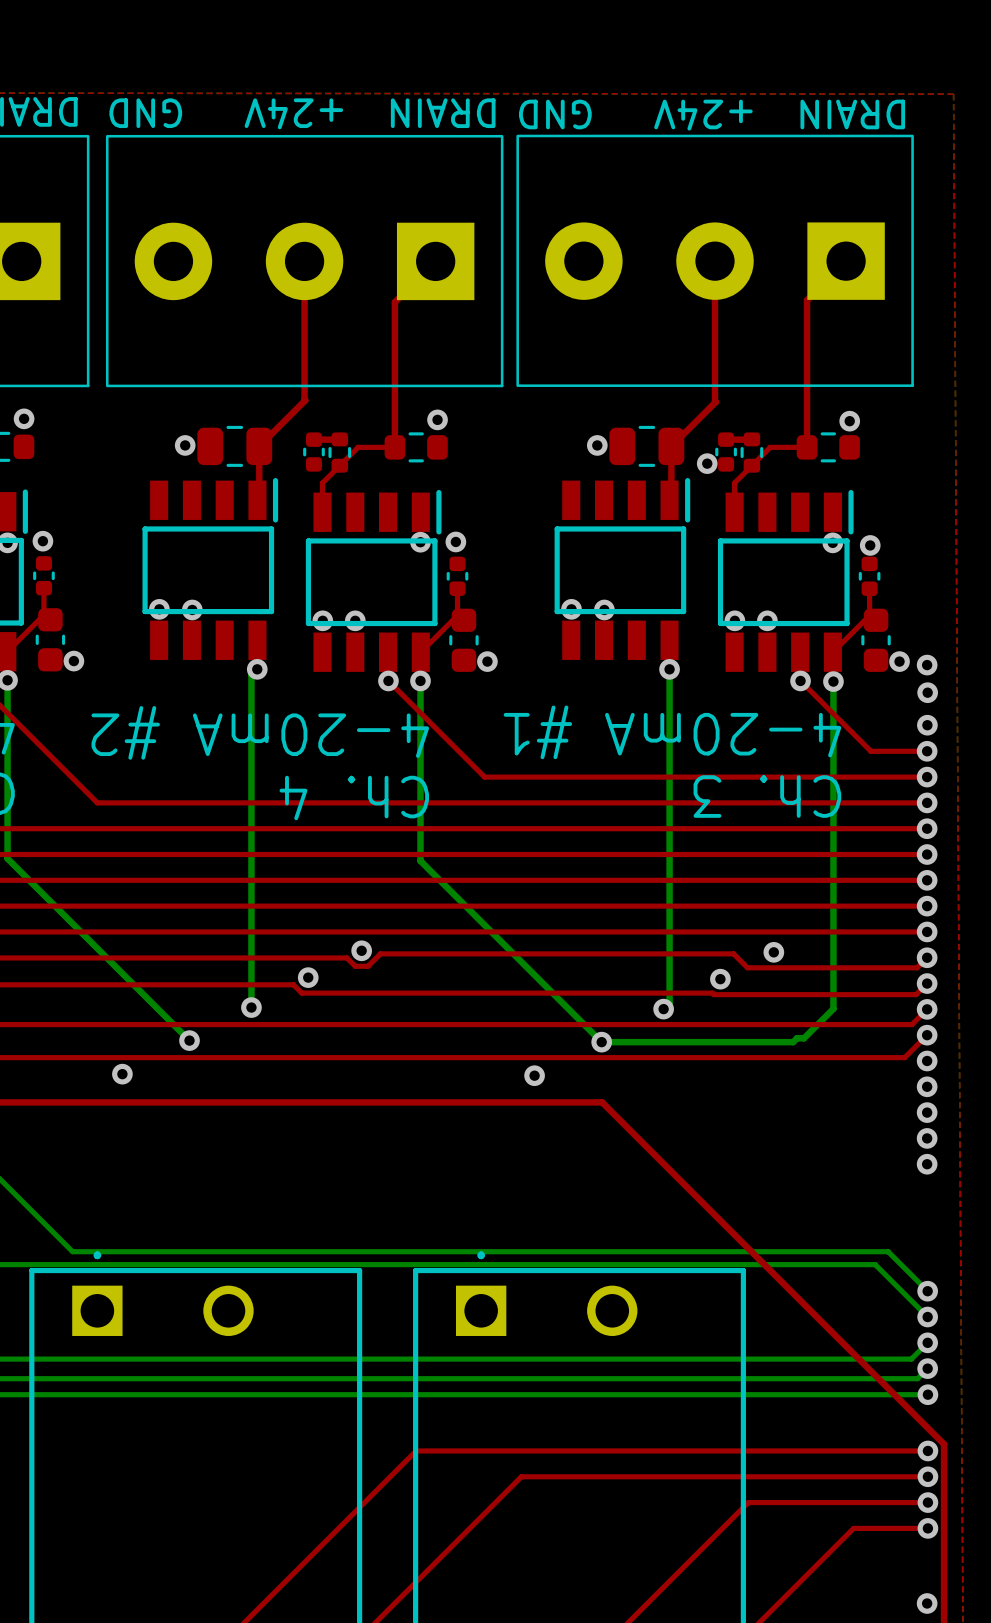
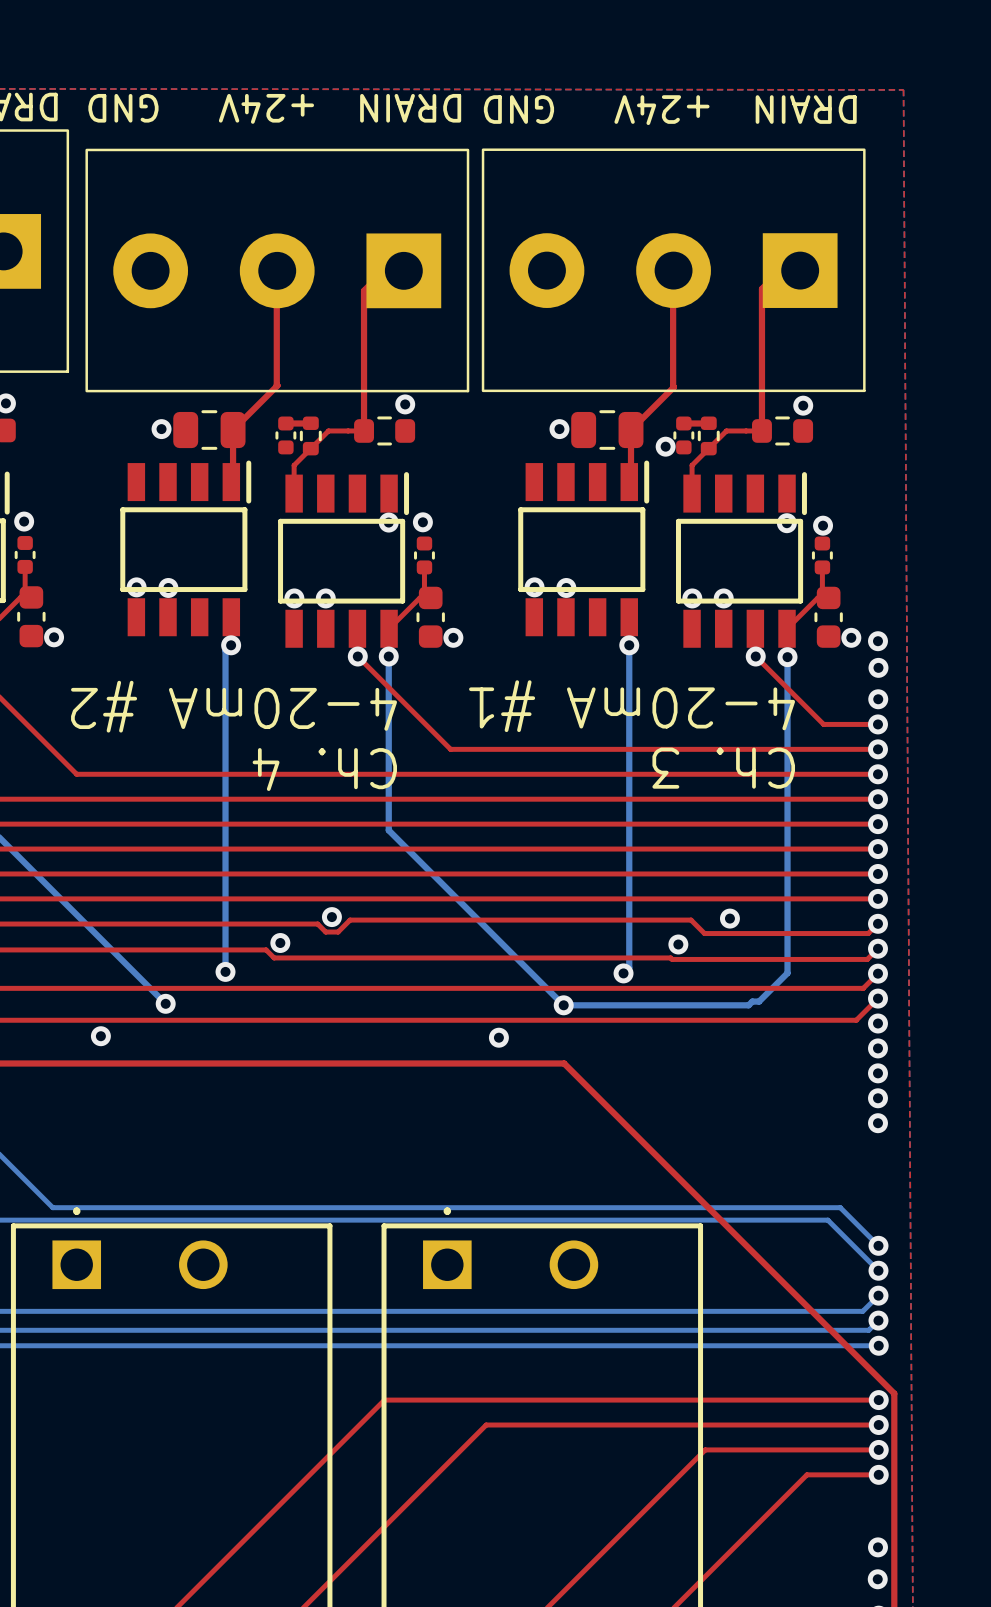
part position: (715, 260) -> (673, 270)
part position: (304, 261) -> (277, 270)

